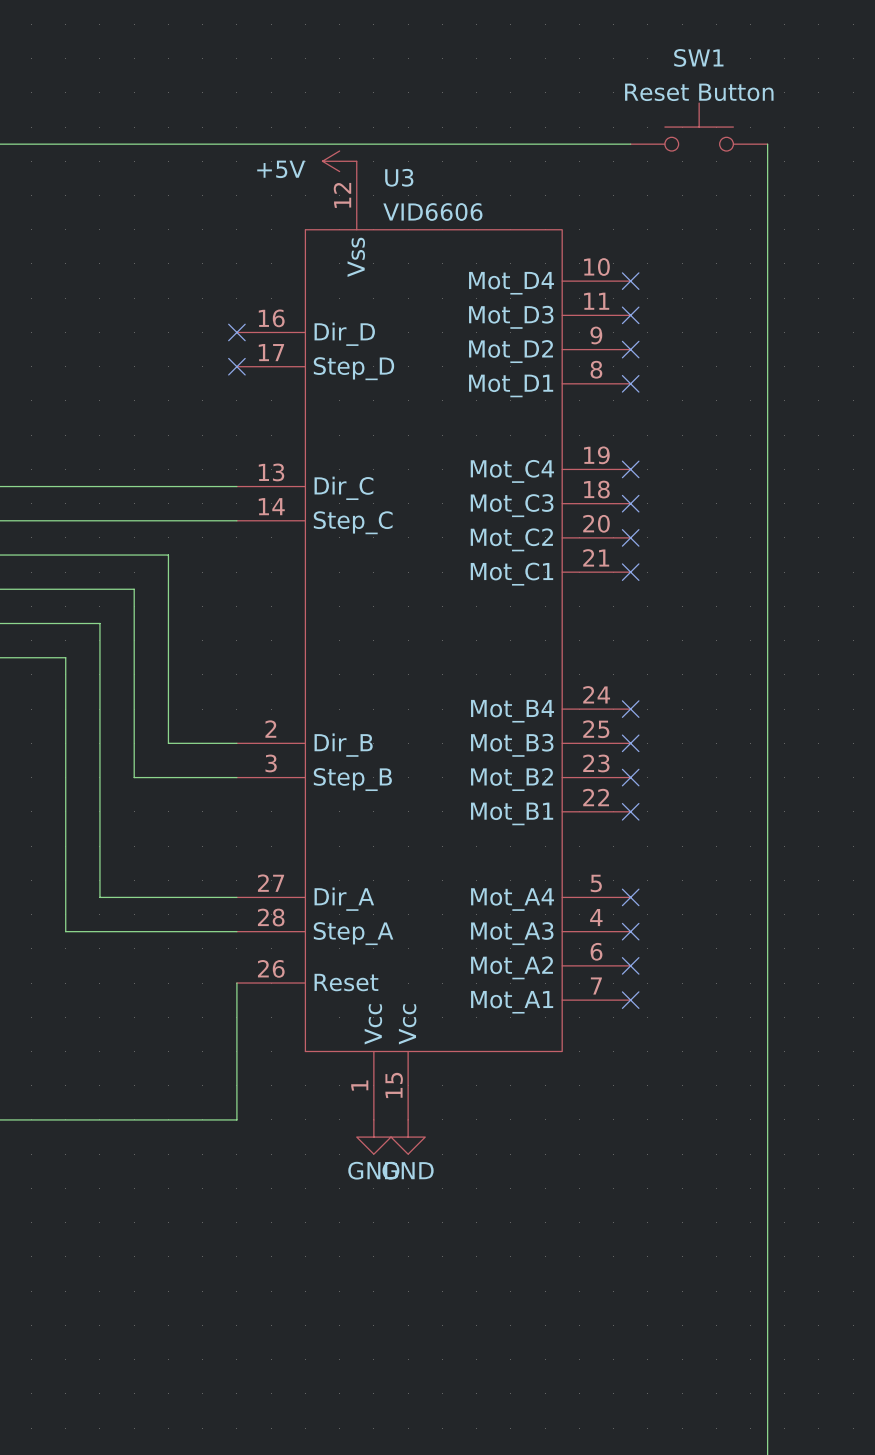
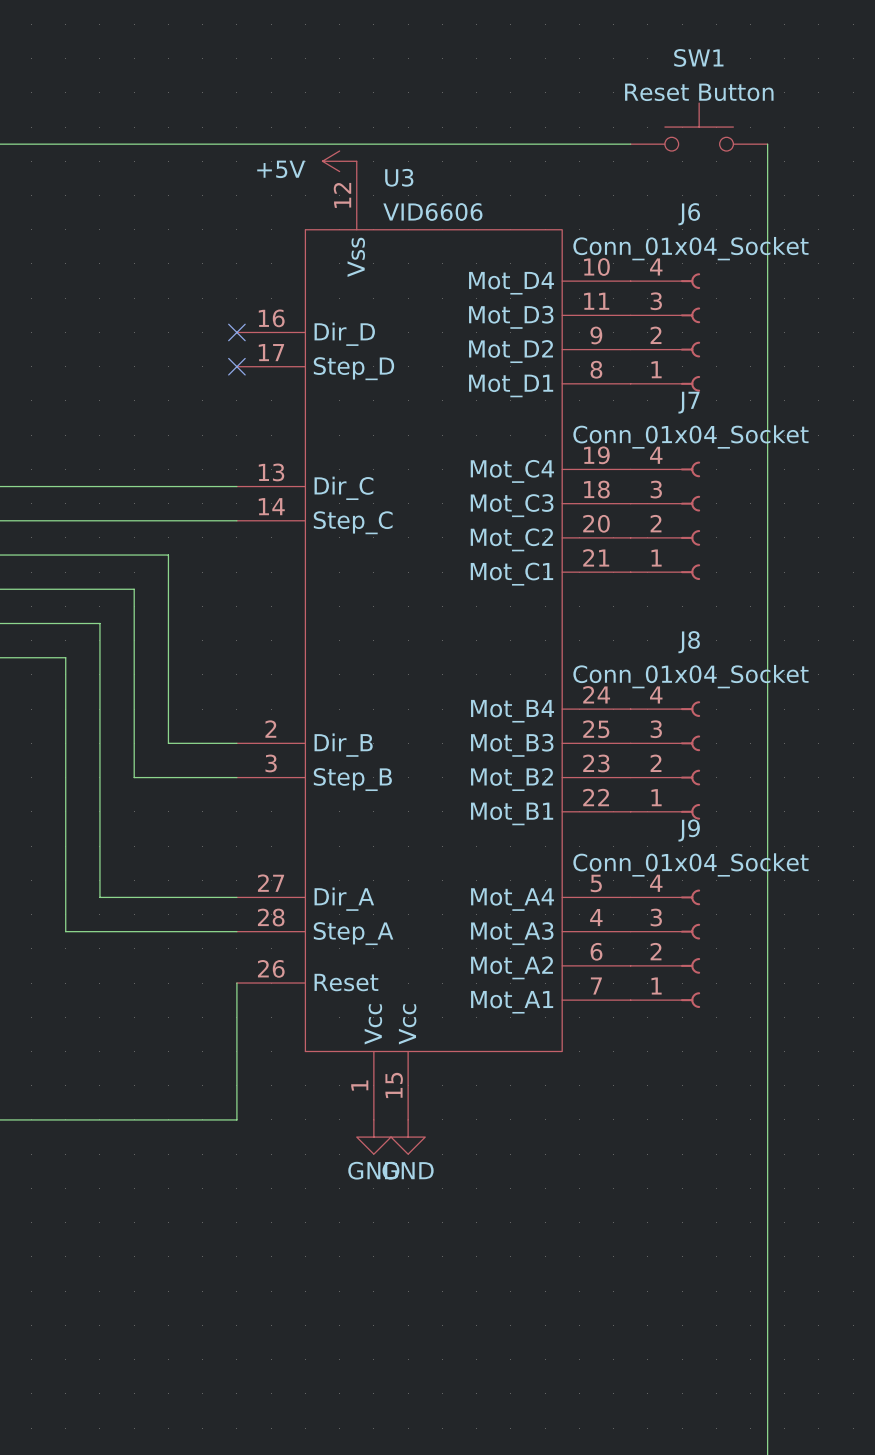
no-connect mark: (630, 281) -> none
no-connect mark: (630, 315) -> none
J6: none -> Conn_01x04_Socket (665, 332)
no-connect mark: (630, 349) -> none
no-connect mark: (630, 383) -> none
no-connect mark: (630, 469) -> none
no-connect mark: (630, 503) -> none
J7: none -> Conn_01x04_Socket (665, 520)
no-connect mark: (630, 537) -> none
no-connect mark: (630, 572) -> none
no-connect mark: (630, 709) -> none
no-connect mark: (630, 743) -> none
J8: none -> Conn_01x04_Socket (665, 760)
no-connect mark: (630, 777) -> none
no-connect mark: (630, 811) -> none
no-connect mark: (630, 897) -> none
no-connect mark: (630, 931) -> none
J9: none -> Conn_01x04_Socket (665, 948)
no-connect mark: (630, 965) -> none
no-connect mark: (630, 1000) -> none

